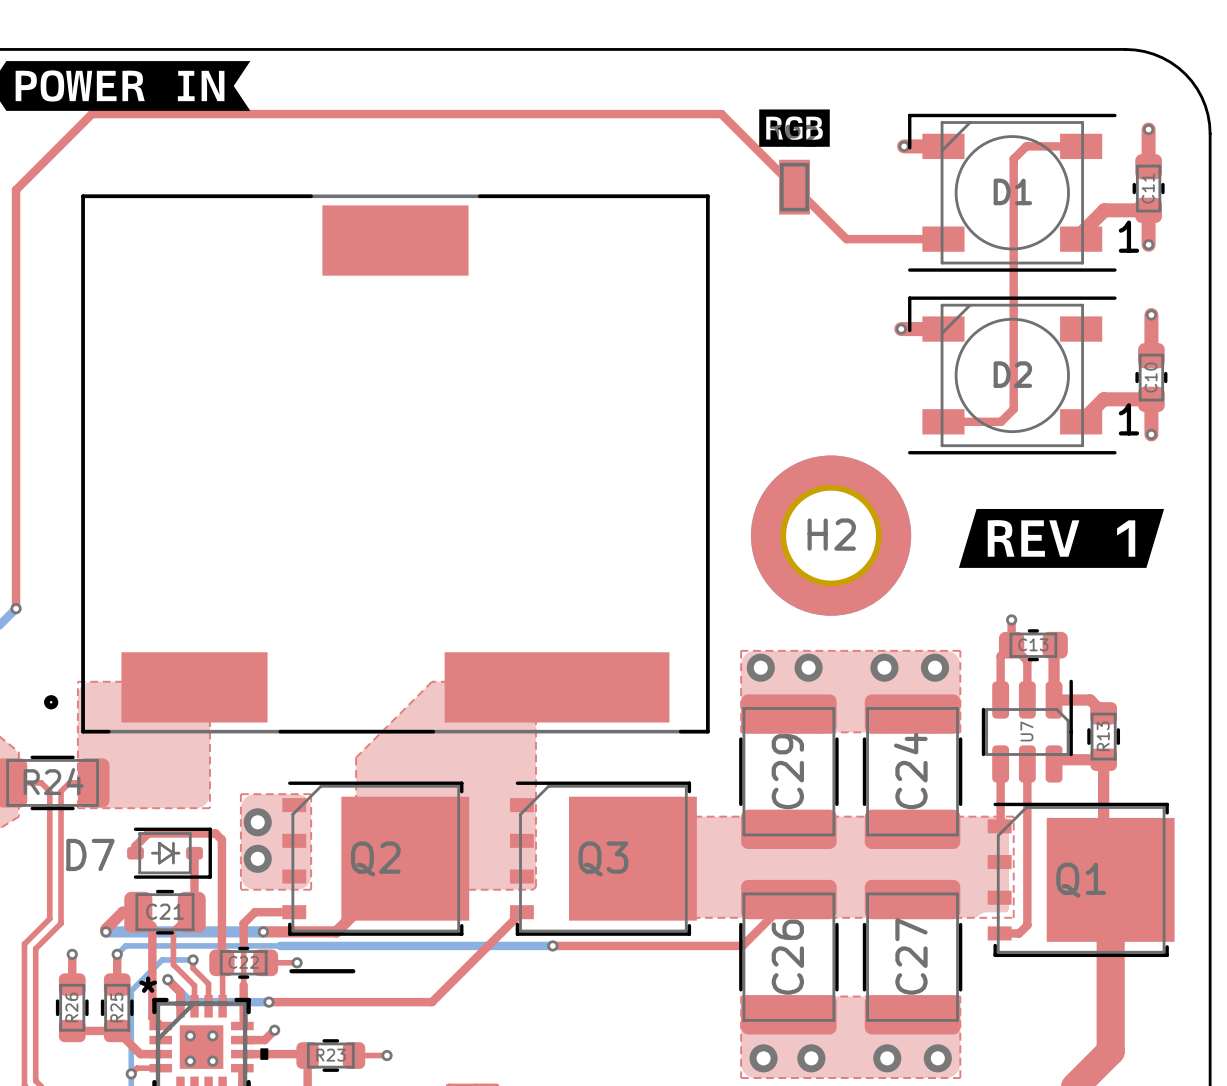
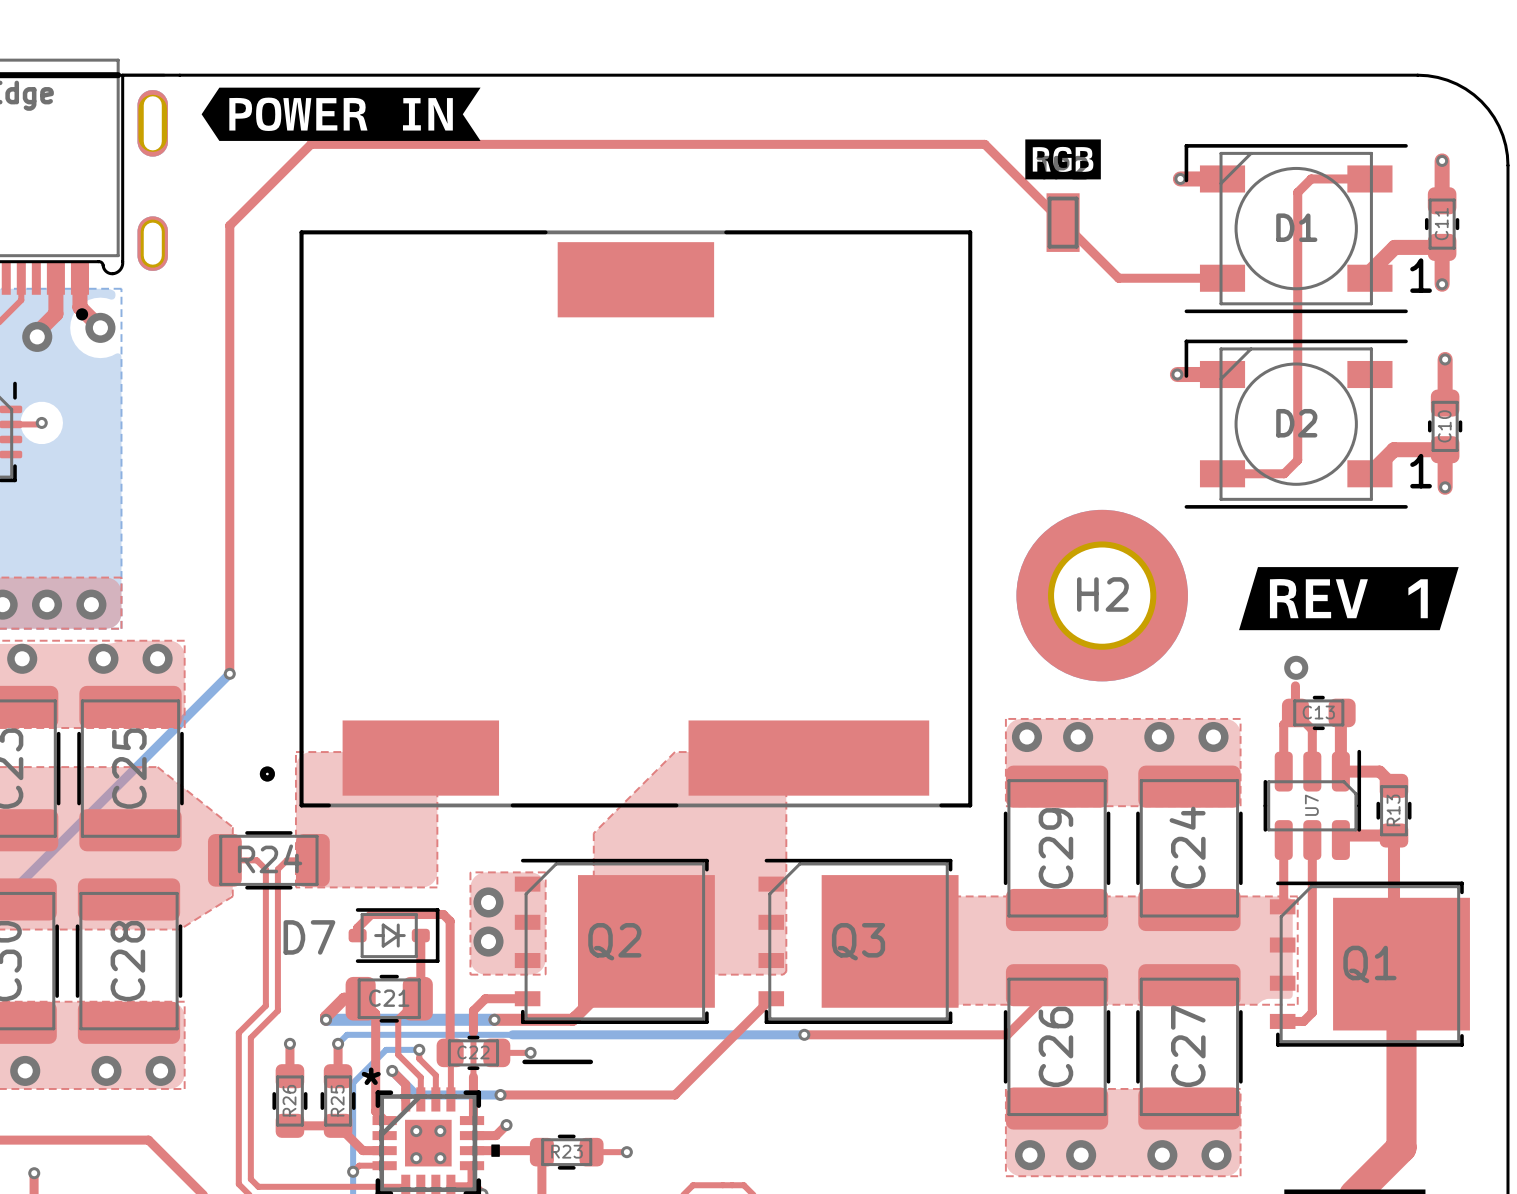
via size: [1005, 614, 1018, 626] -> [1284, 655, 1309, 680]

